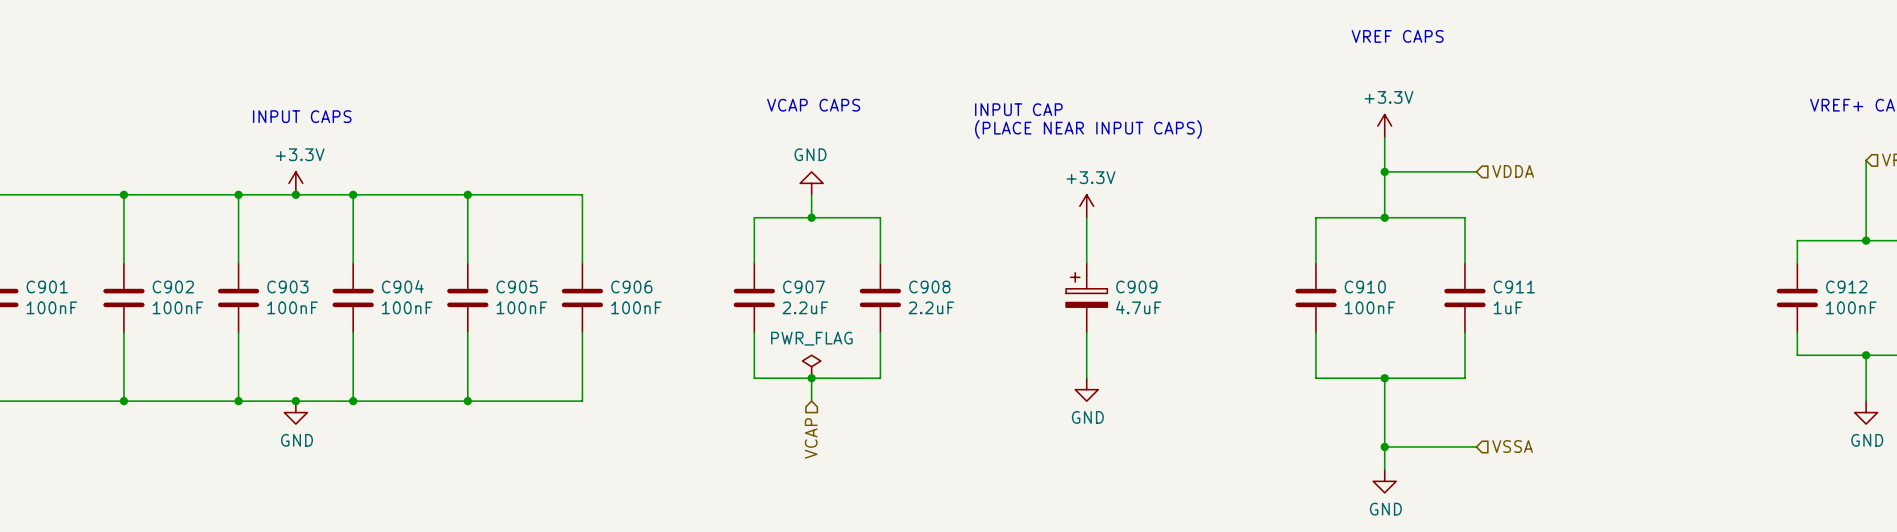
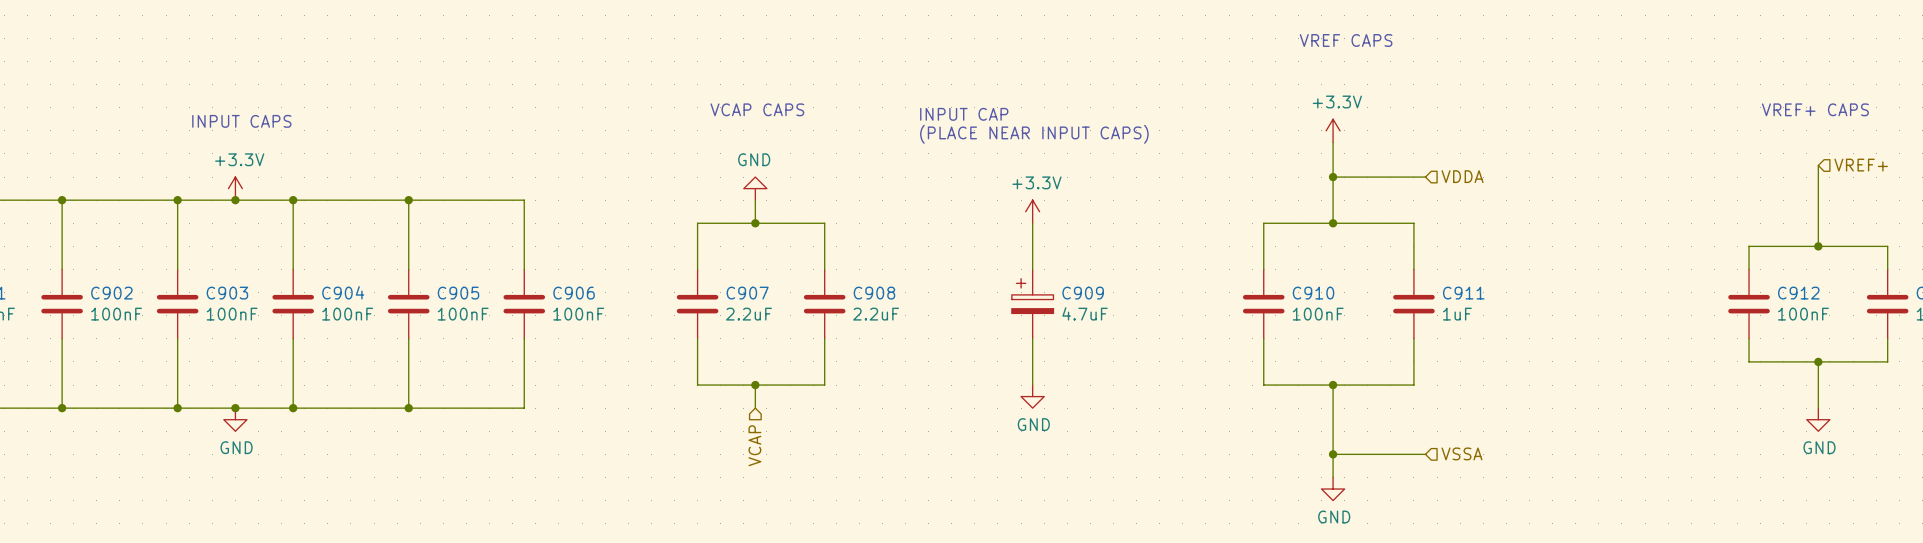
power symbol: PWR_FLAG (811, 366) -> none

